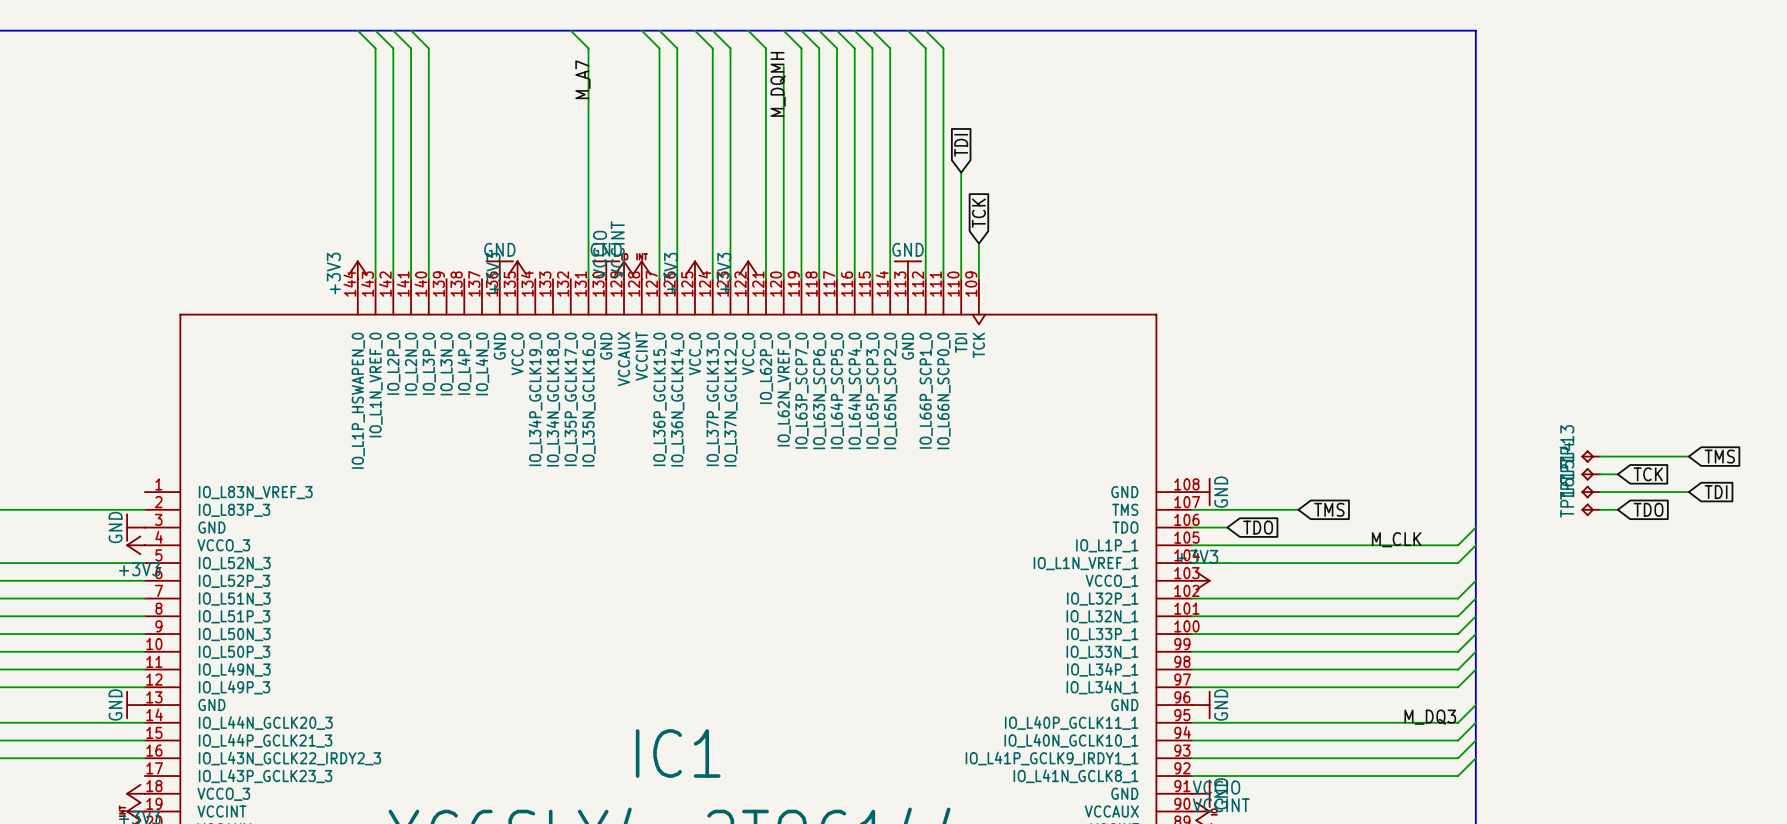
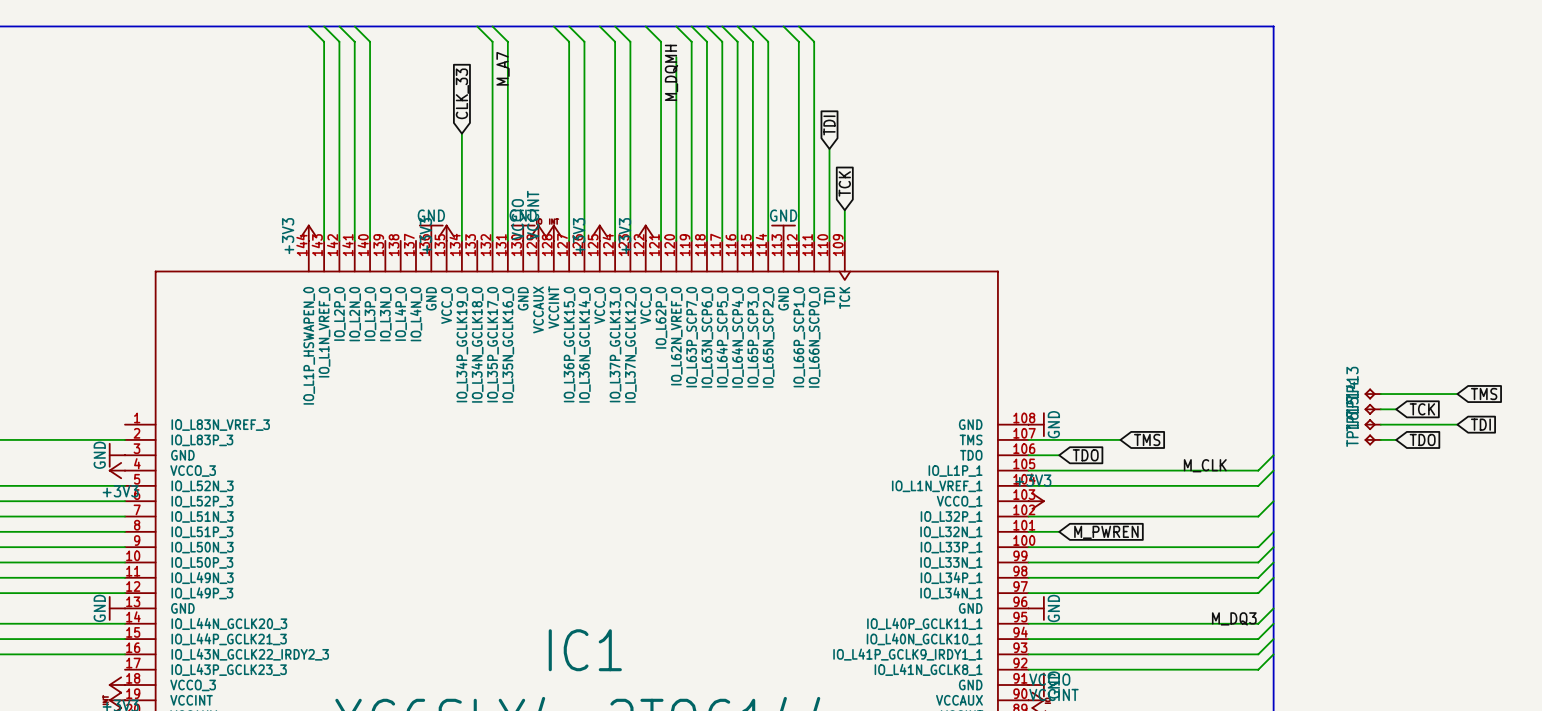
wire: none -> (477, 26) (492, 41) (492, 240)
global label: none -> CLK_33 (462, 93)
wire: none -> (461, 133) (461, 240)
wire: (1475, 598) (1458, 616) (1227, 616) -> none
global label: none -> M_PWREN (1106, 532)

